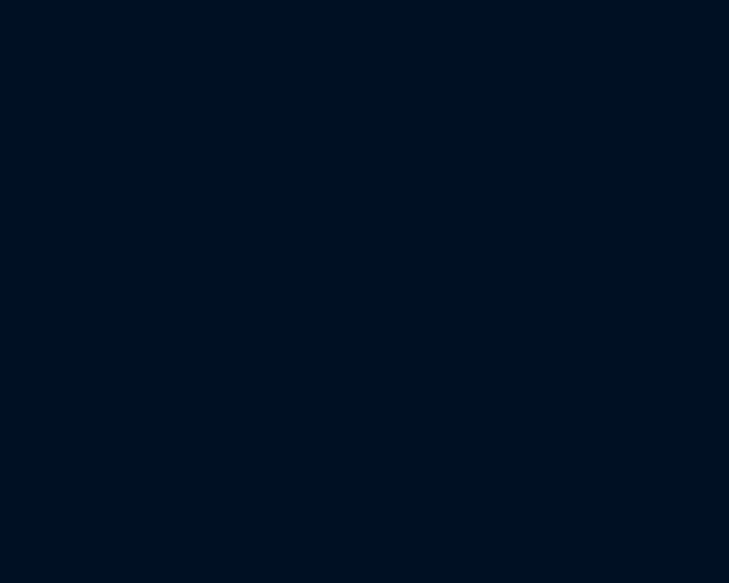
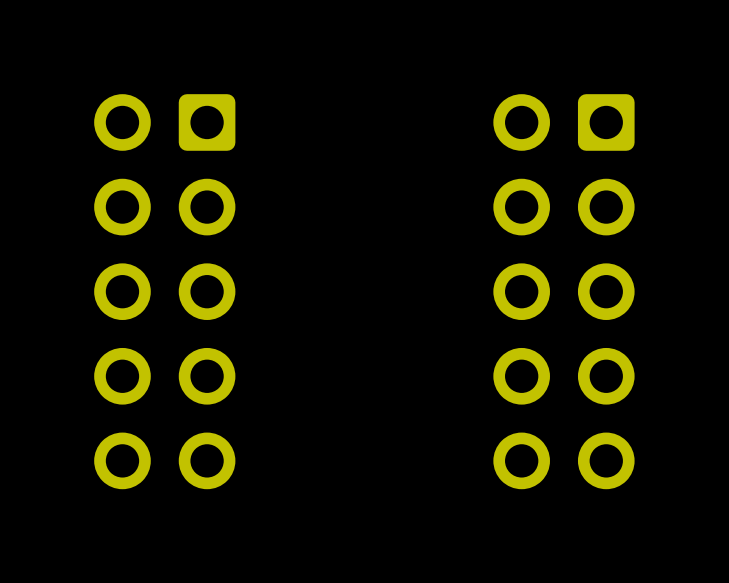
part: none -> (164, 291)
part: none -> (563, 291)

